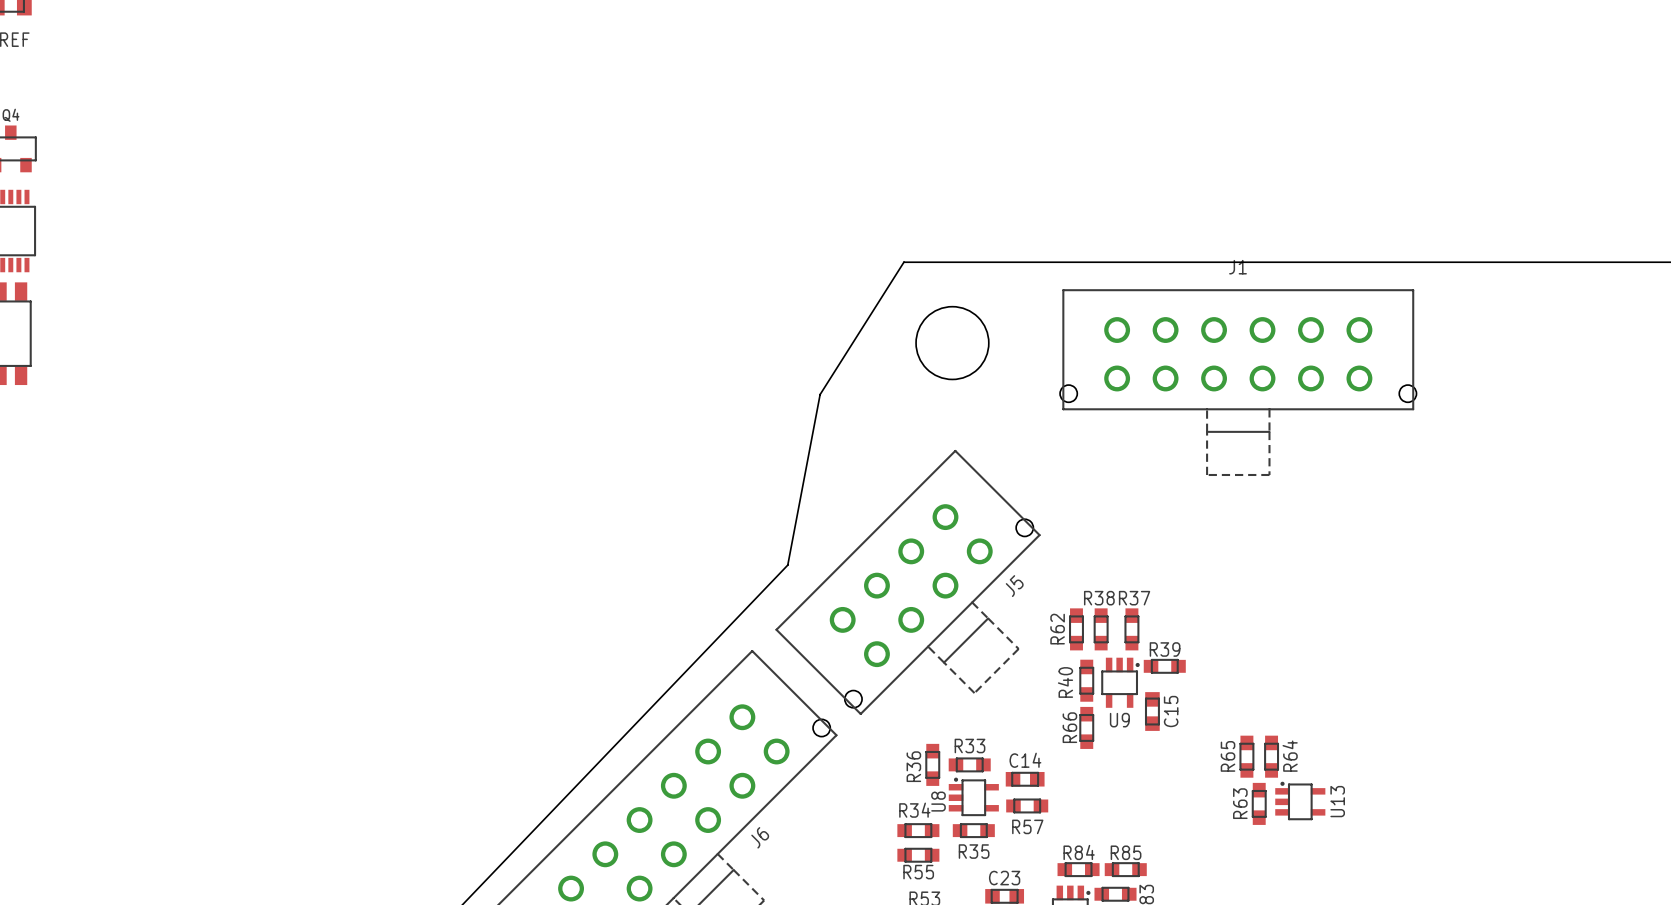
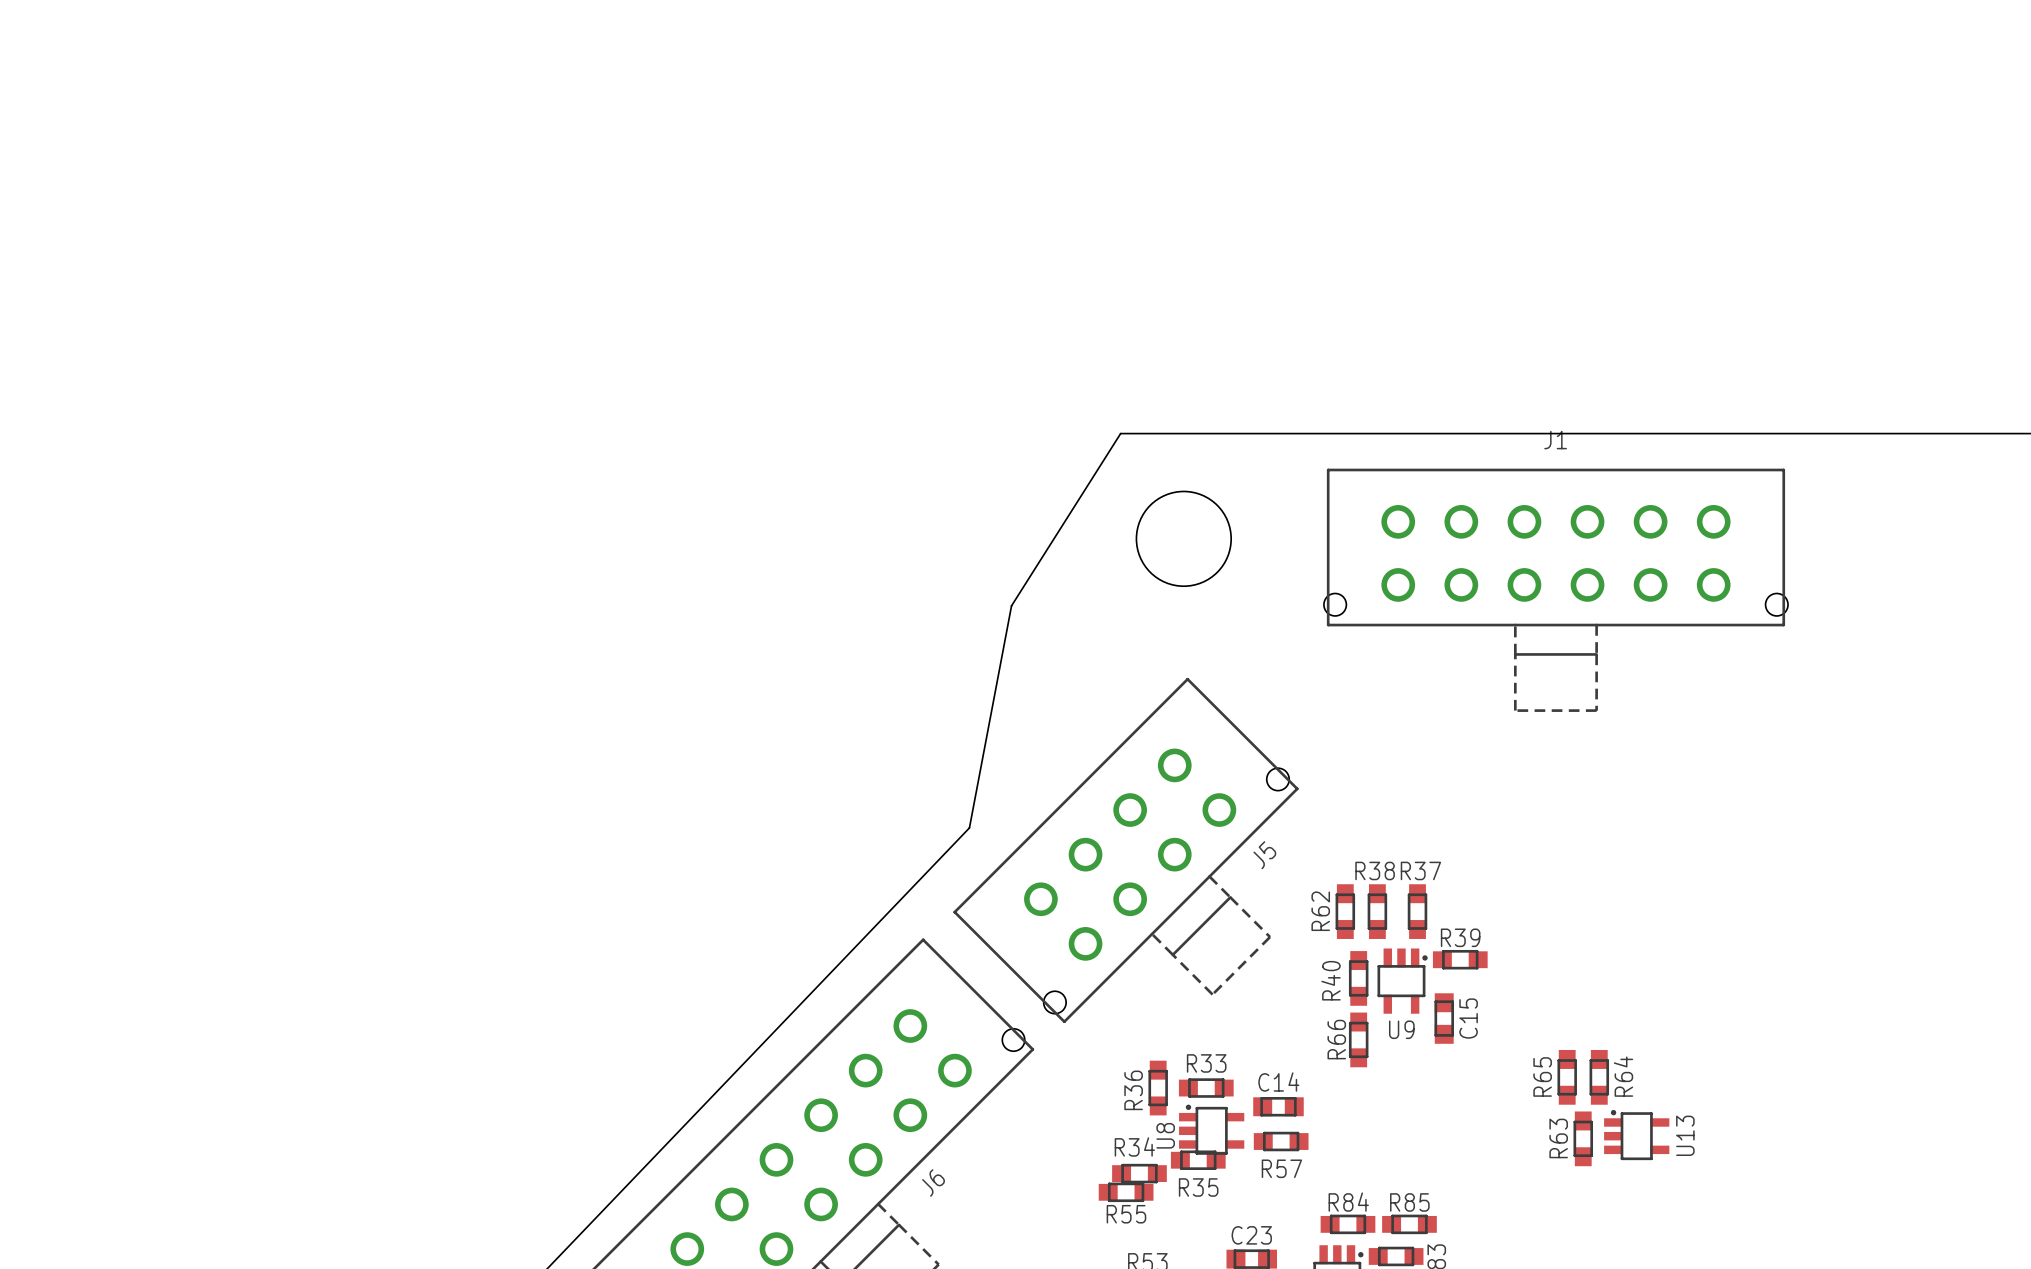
R35 position: (973, 830) -> (1198, 1160)
R55 position: (918, 855) -> (1126, 1192)

